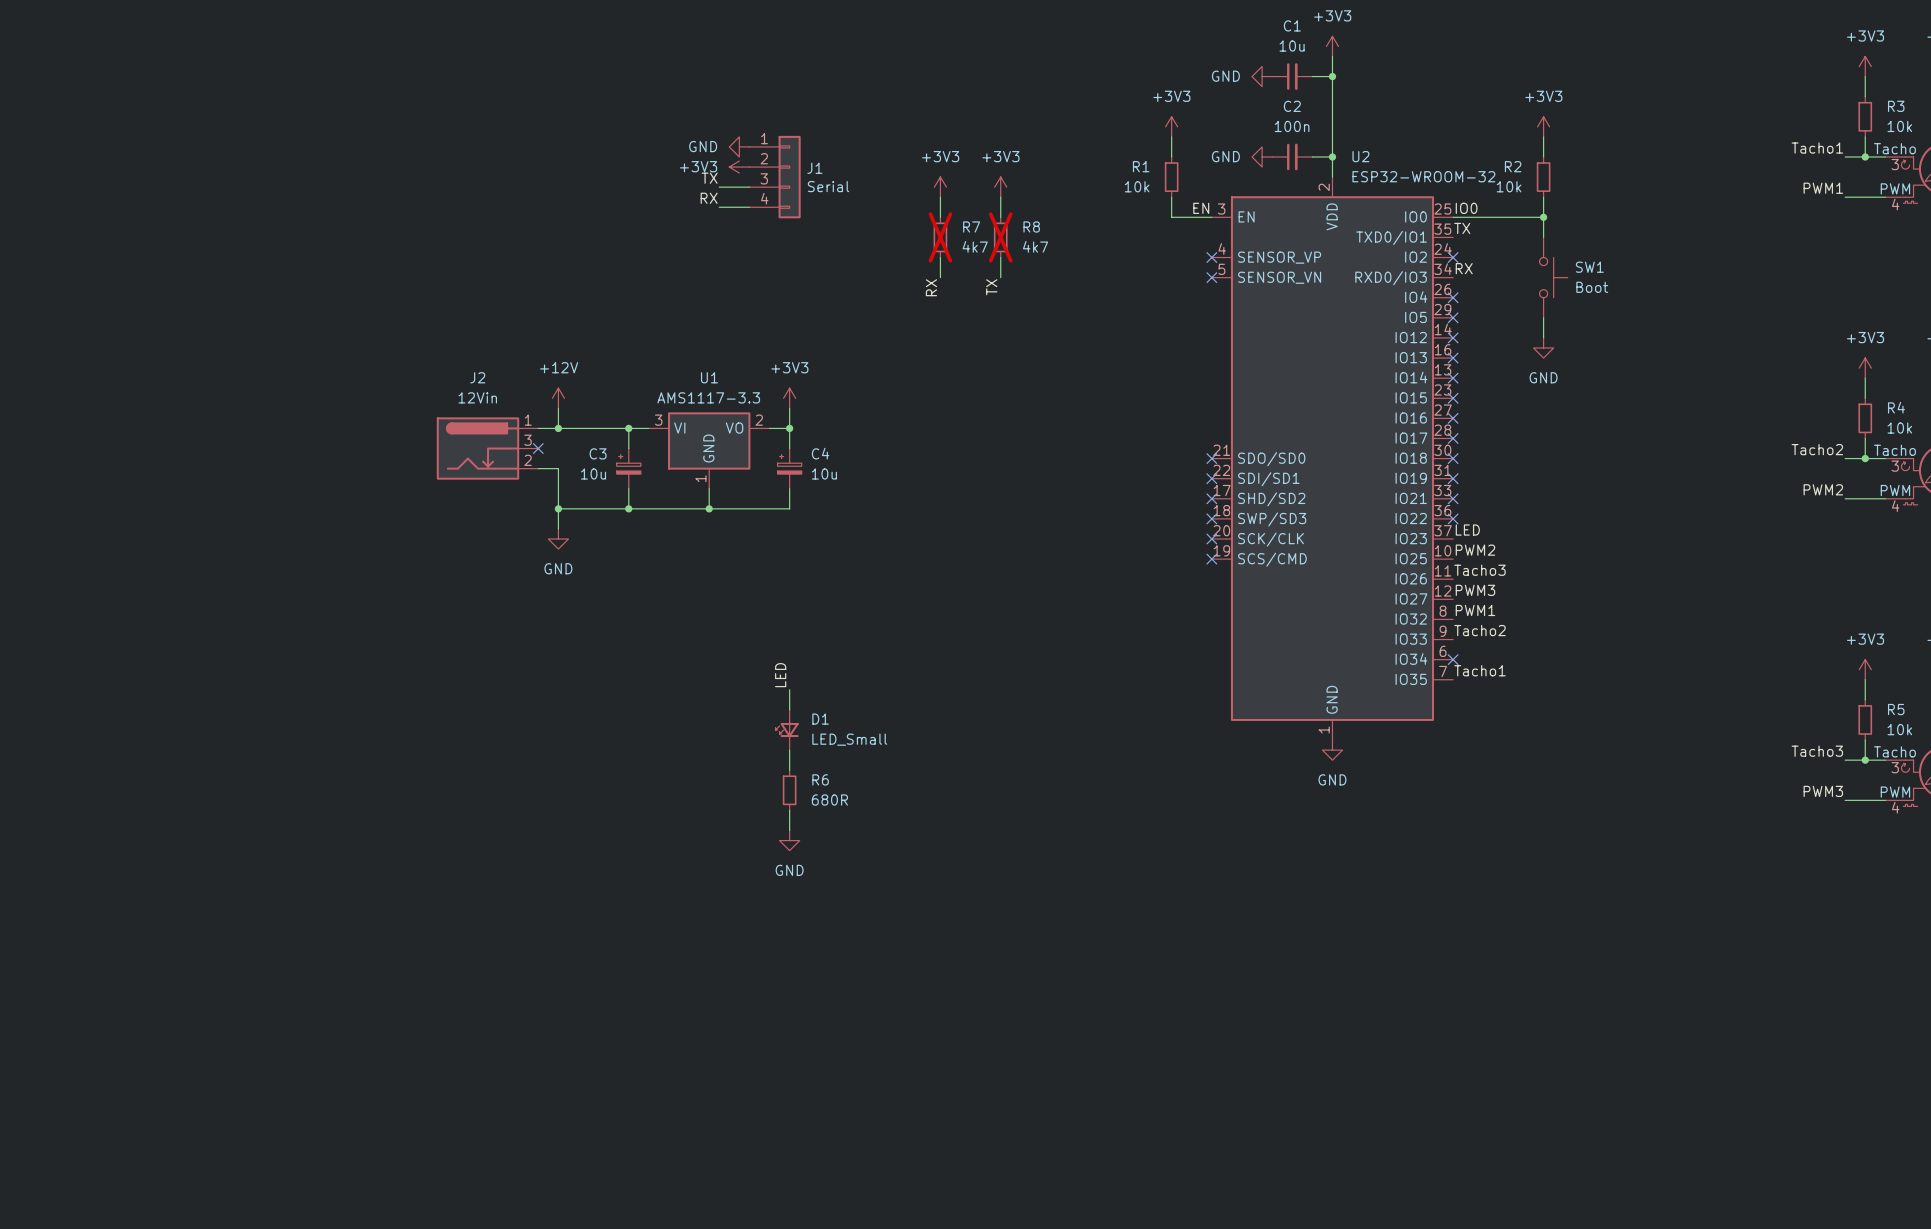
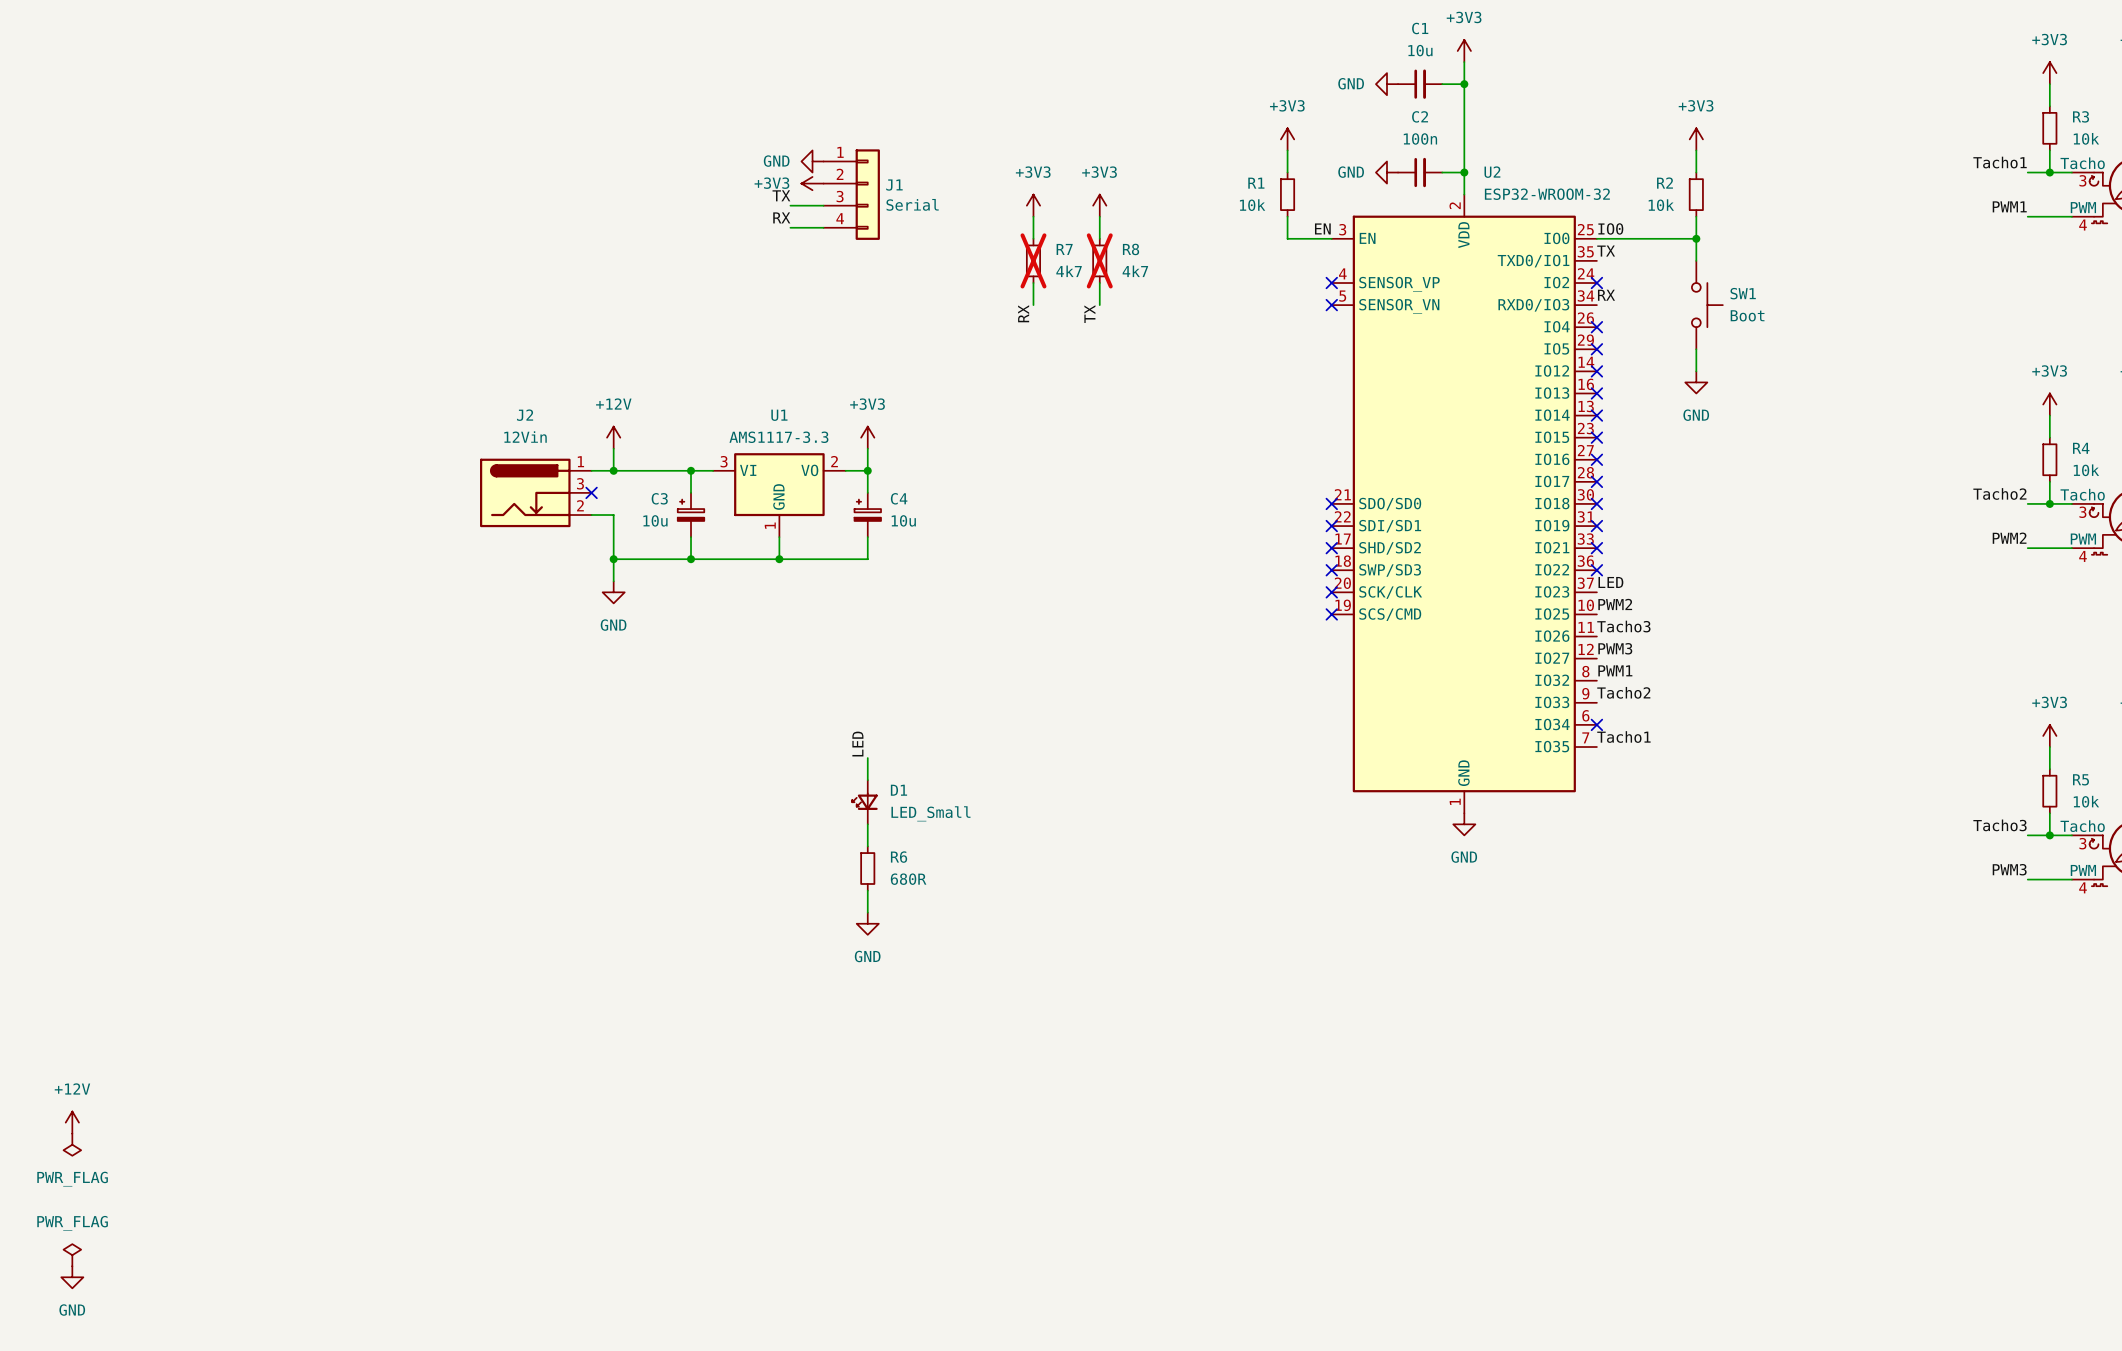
power symbol: none -> +12V (72, 1122)
power symbol: none -> PWR_FLAG (72, 1144)
power symbol: none -> PWR_FLAG (72, 1255)
power symbol: none -> GND (72, 1277)

